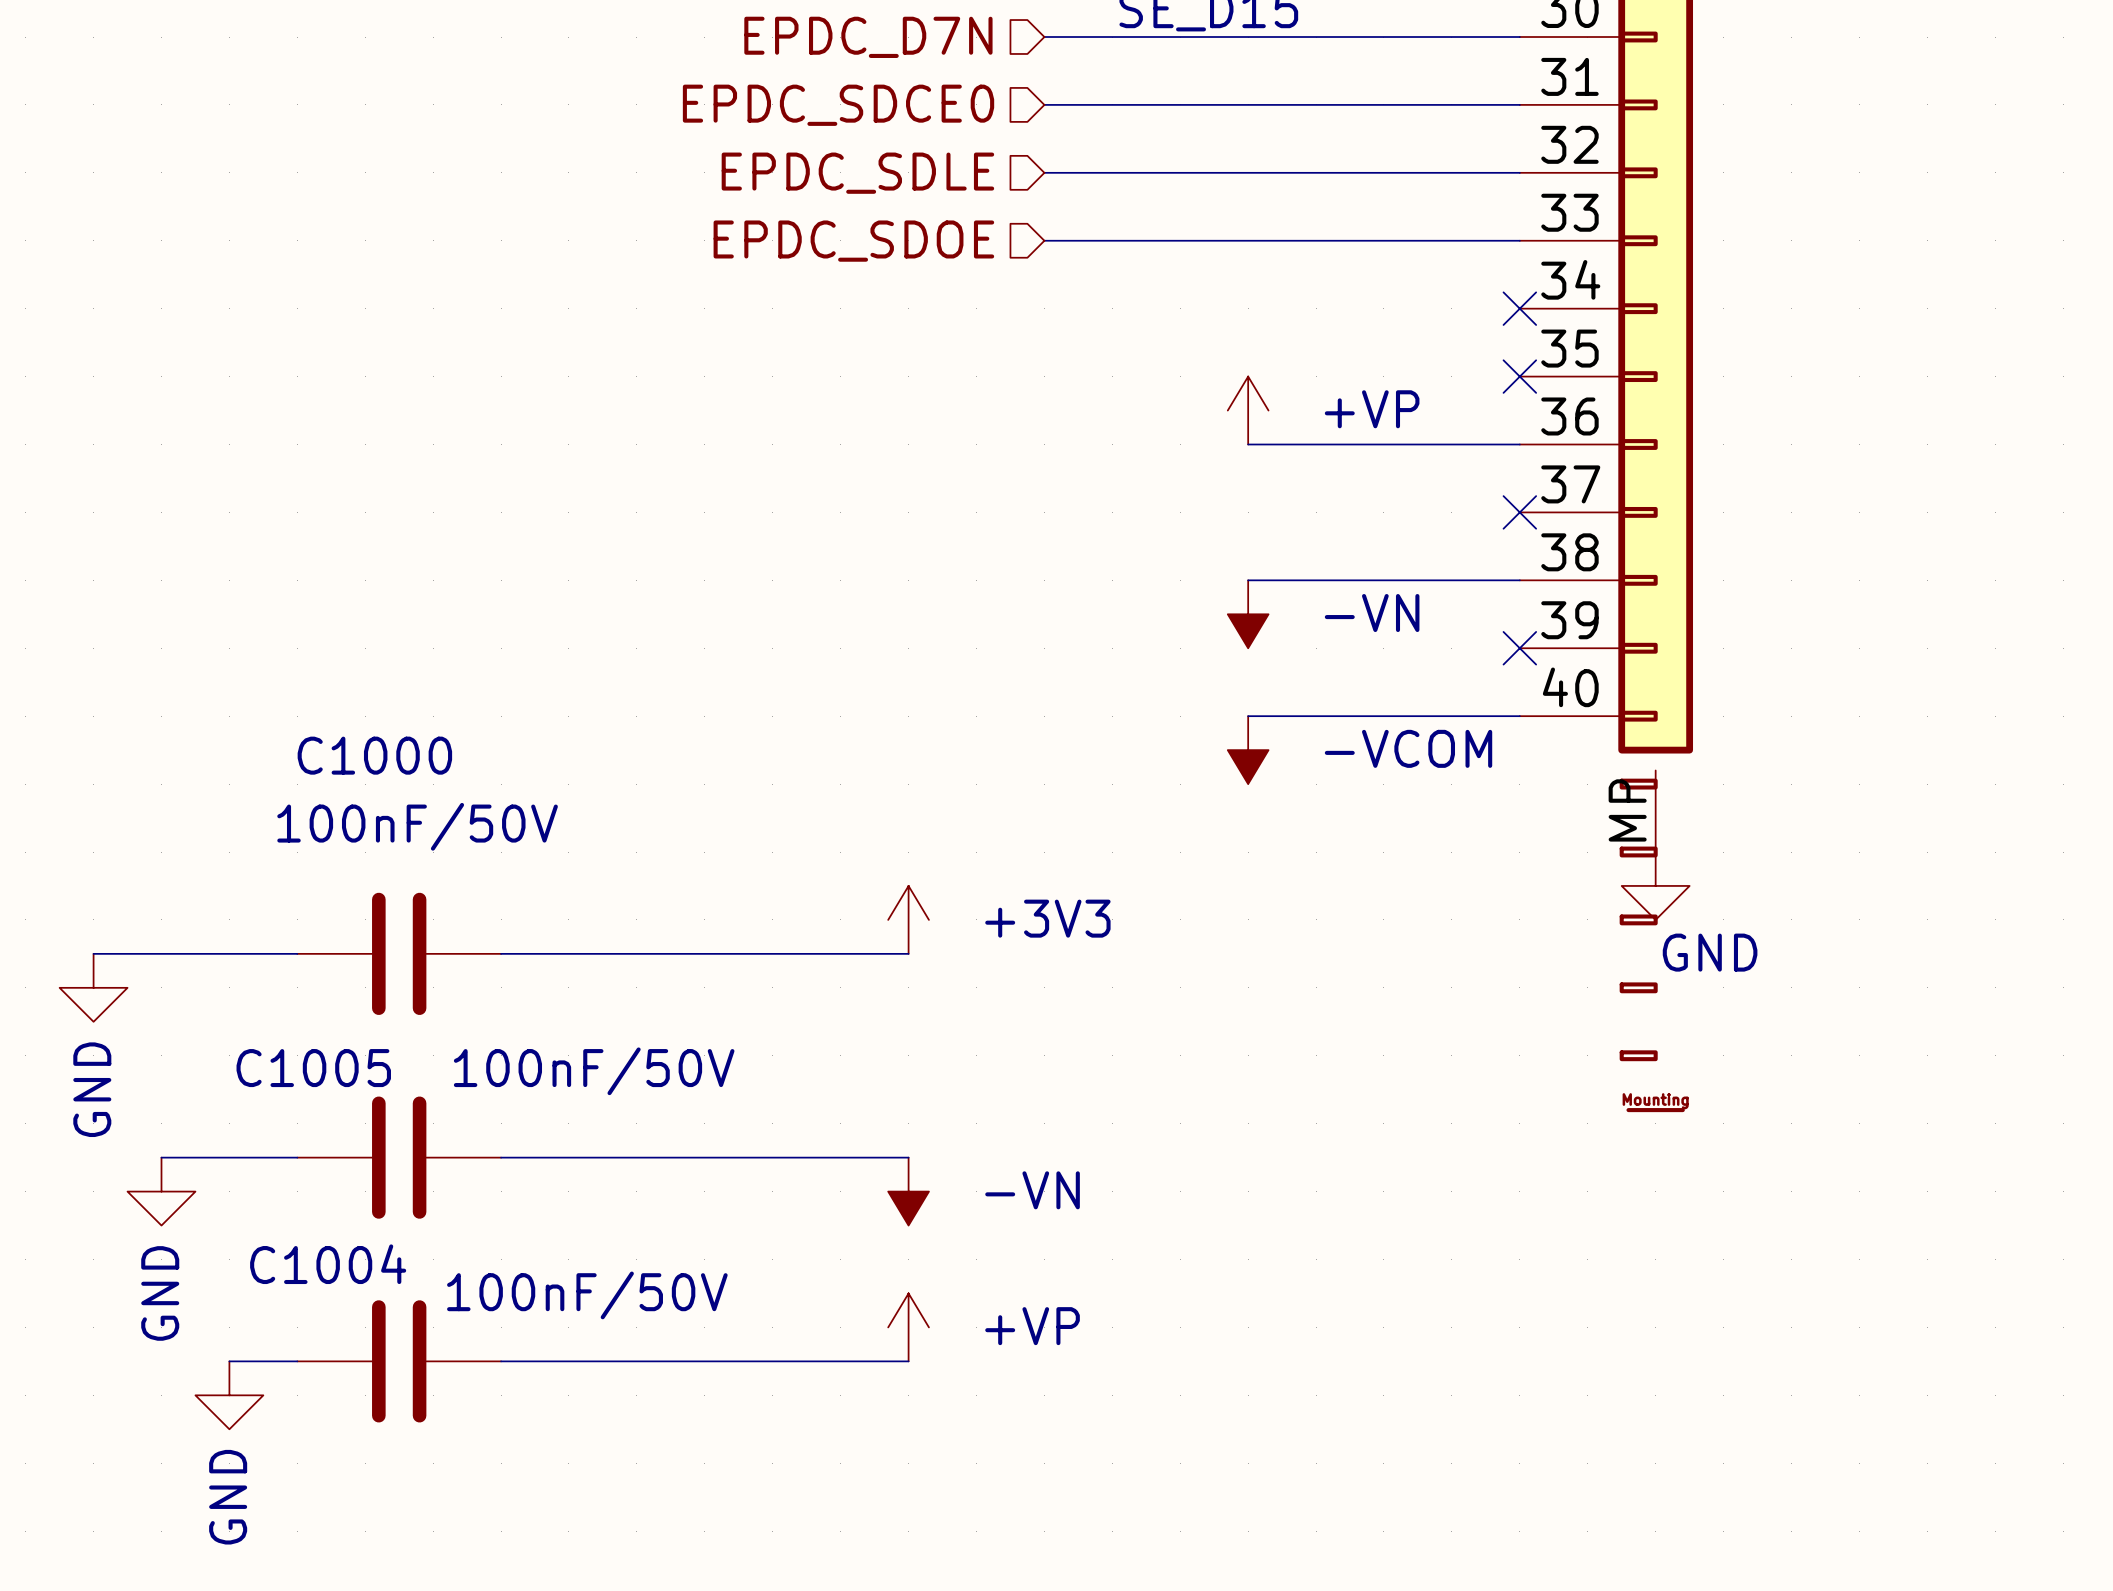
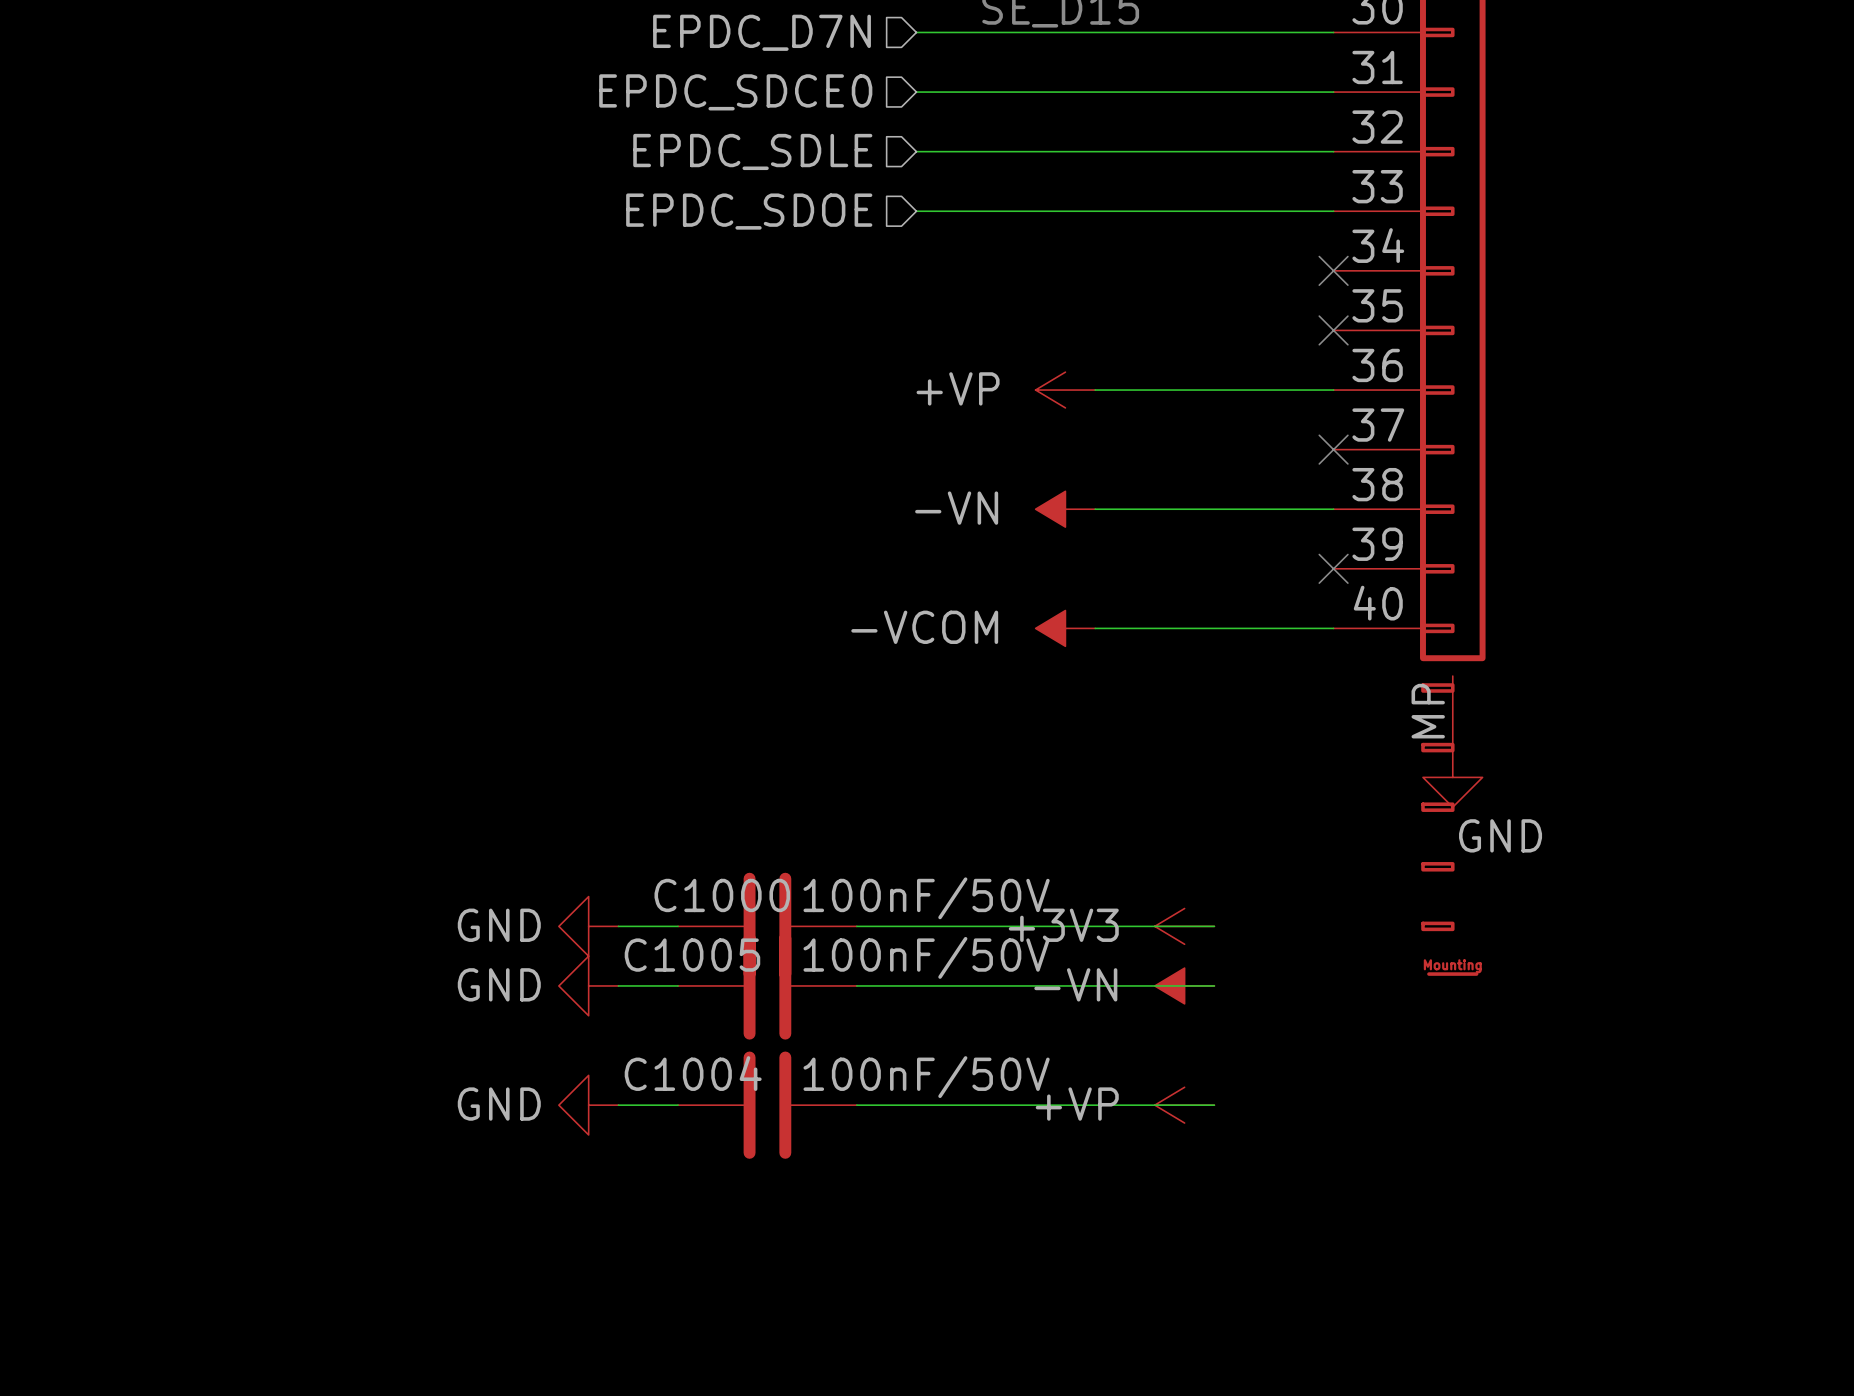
power symbol text position: +VP (1372, 409) -> +VP (958, 388)
power symbol rotation: 0° (1248, 410) -> 90° counterclockwise (1065, 390)
power symbol position: +VP (1248, 410) -> +VP (1065, 390)
power symbol text position: -VN (1372, 613) -> -VN (956, 508)
power symbol rotation: 0° (1248, 614) -> 90° clockwise (1065, 509)
power symbol position: -VN (1248, 614) -> -VN (1065, 509)
power symbol text position: -VCOM (1408, 748) -> -VCOM (924, 627)
power symbol rotation: 0° (1248, 750) -> 90° clockwise (1065, 628)
power symbol position: -VCOM (1248, 750) -> -VCOM (1065, 628)
C1000 name position: C1000 (374, 755) -> C1000 (722, 895)
C1000 value position: 100nF/50V (417, 826) -> 100nF/50V (926, 898)
power symbol text position: +3V3 (1047, 918) -> +3V3 (1063, 925)
power symbol rotation: 0° (908, 919) -> 90° counterclockwise (1184, 926)
power symbol position: +3V3 (908, 919) -> +3V3 (1184, 926)
wire: (93, 953) (297, 953) -> none
C1000 position: (399, 953) -> (767, 926)
wire: (501, 953) (908, 953) -> (856, 985) (1214, 985)
power symbol: GND (93, 987) -> none
power symbol: none -> GND (588, 926)
wire: none -> (618, 926) (678, 926)
C1005 name position: C1005 (313, 1068) -> C1005 (692, 955)
C1005 value position: 100nF/50V (594, 1071) -> 100nF/50V (926, 957)
power symbol: none -> GND (588, 985)
wire: none -> (618, 985) (678, 985)
power symbol: none -> -VN (1184, 985)
wire: (161, 1157) (297, 1157) -> none
C1005 position: (399, 1157) -> (767, 985)
wire: (501, 1157) (908, 1157) -> (856, 926) (1214, 926)
power symbol: GND (161, 1191) -> none
power symbol: -VN (908, 1191) -> none
power symbol: none -> GND (588, 1105)
power symbol: none -> +VP (1184, 1105)
C1004 name position: C1004 (328, 1264) -> C1004 (693, 1073)
C1004 value position: 100nF/50V (587, 1295) -> 100nF/50V (926, 1077)
power symbol: +VP (908, 1327) -> none
wire: (229, 1361) (297, 1361) -> (618, 1105) (678, 1105)
C1004 position: (399, 1361) -> (767, 1105)
wire: (501, 1361) (908, 1361) -> (856, 1105) (1214, 1105)
power symbol: GND (229, 1395) -> none

